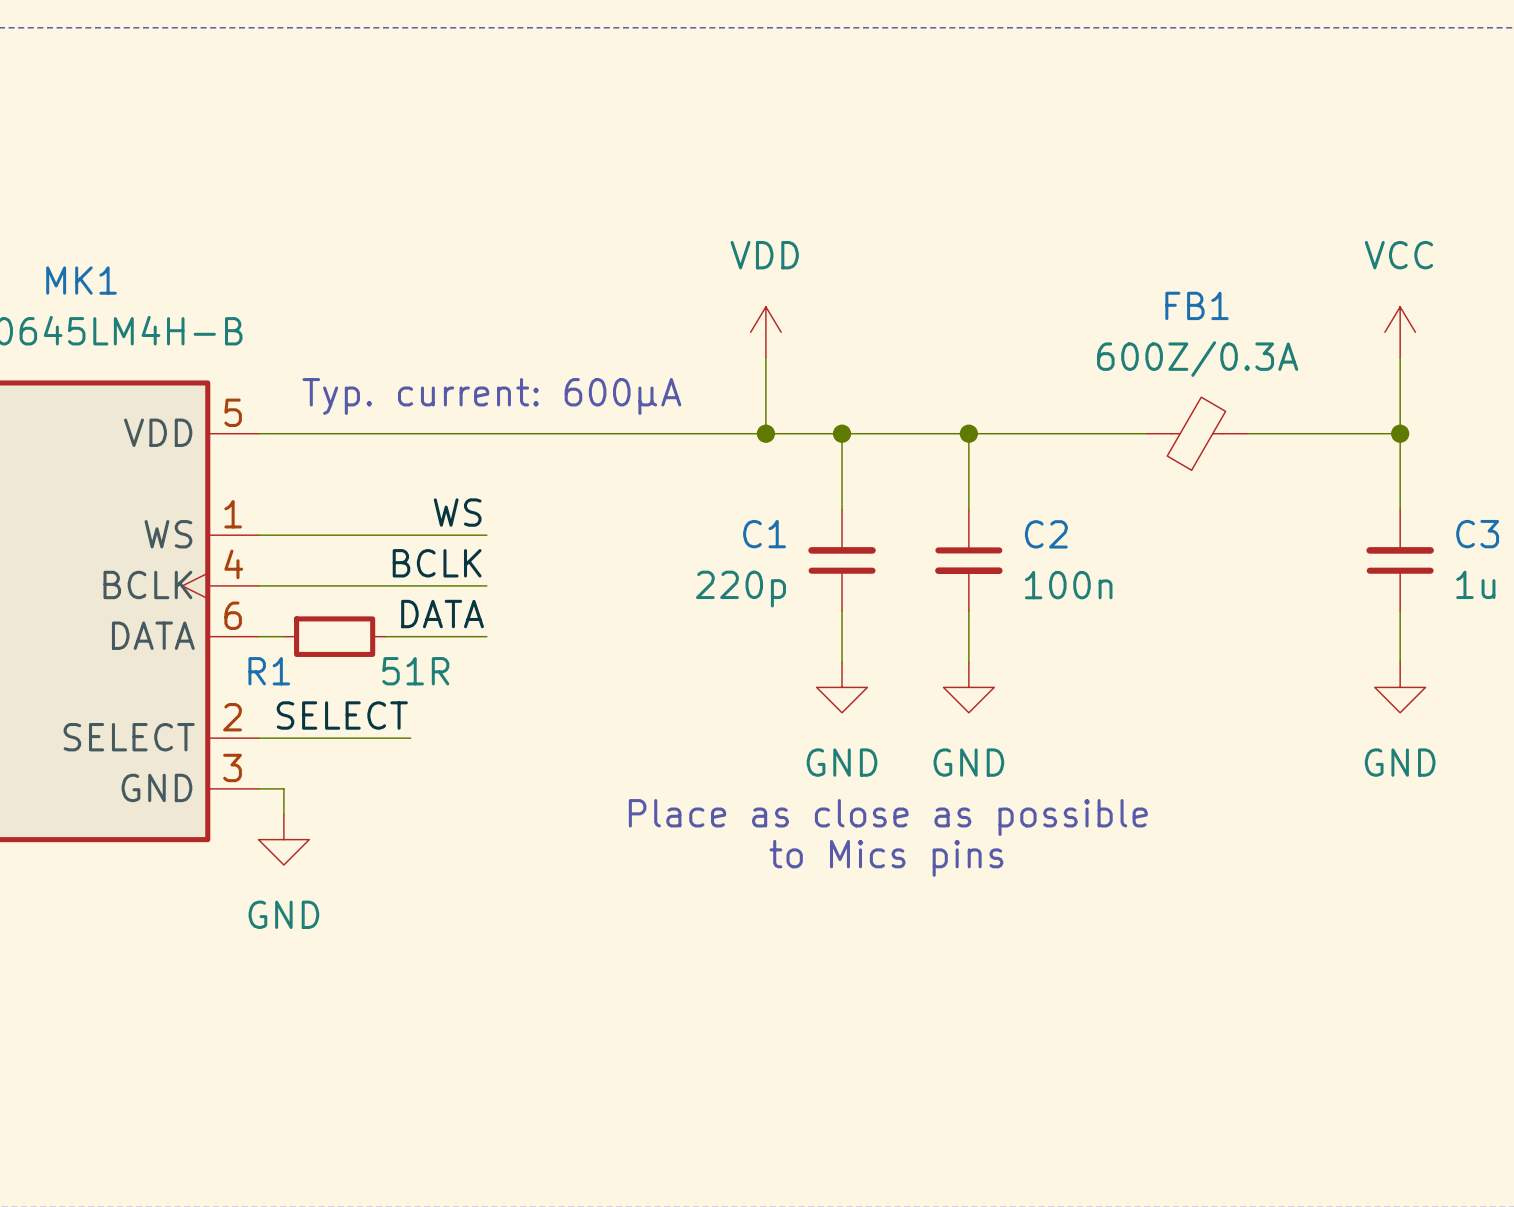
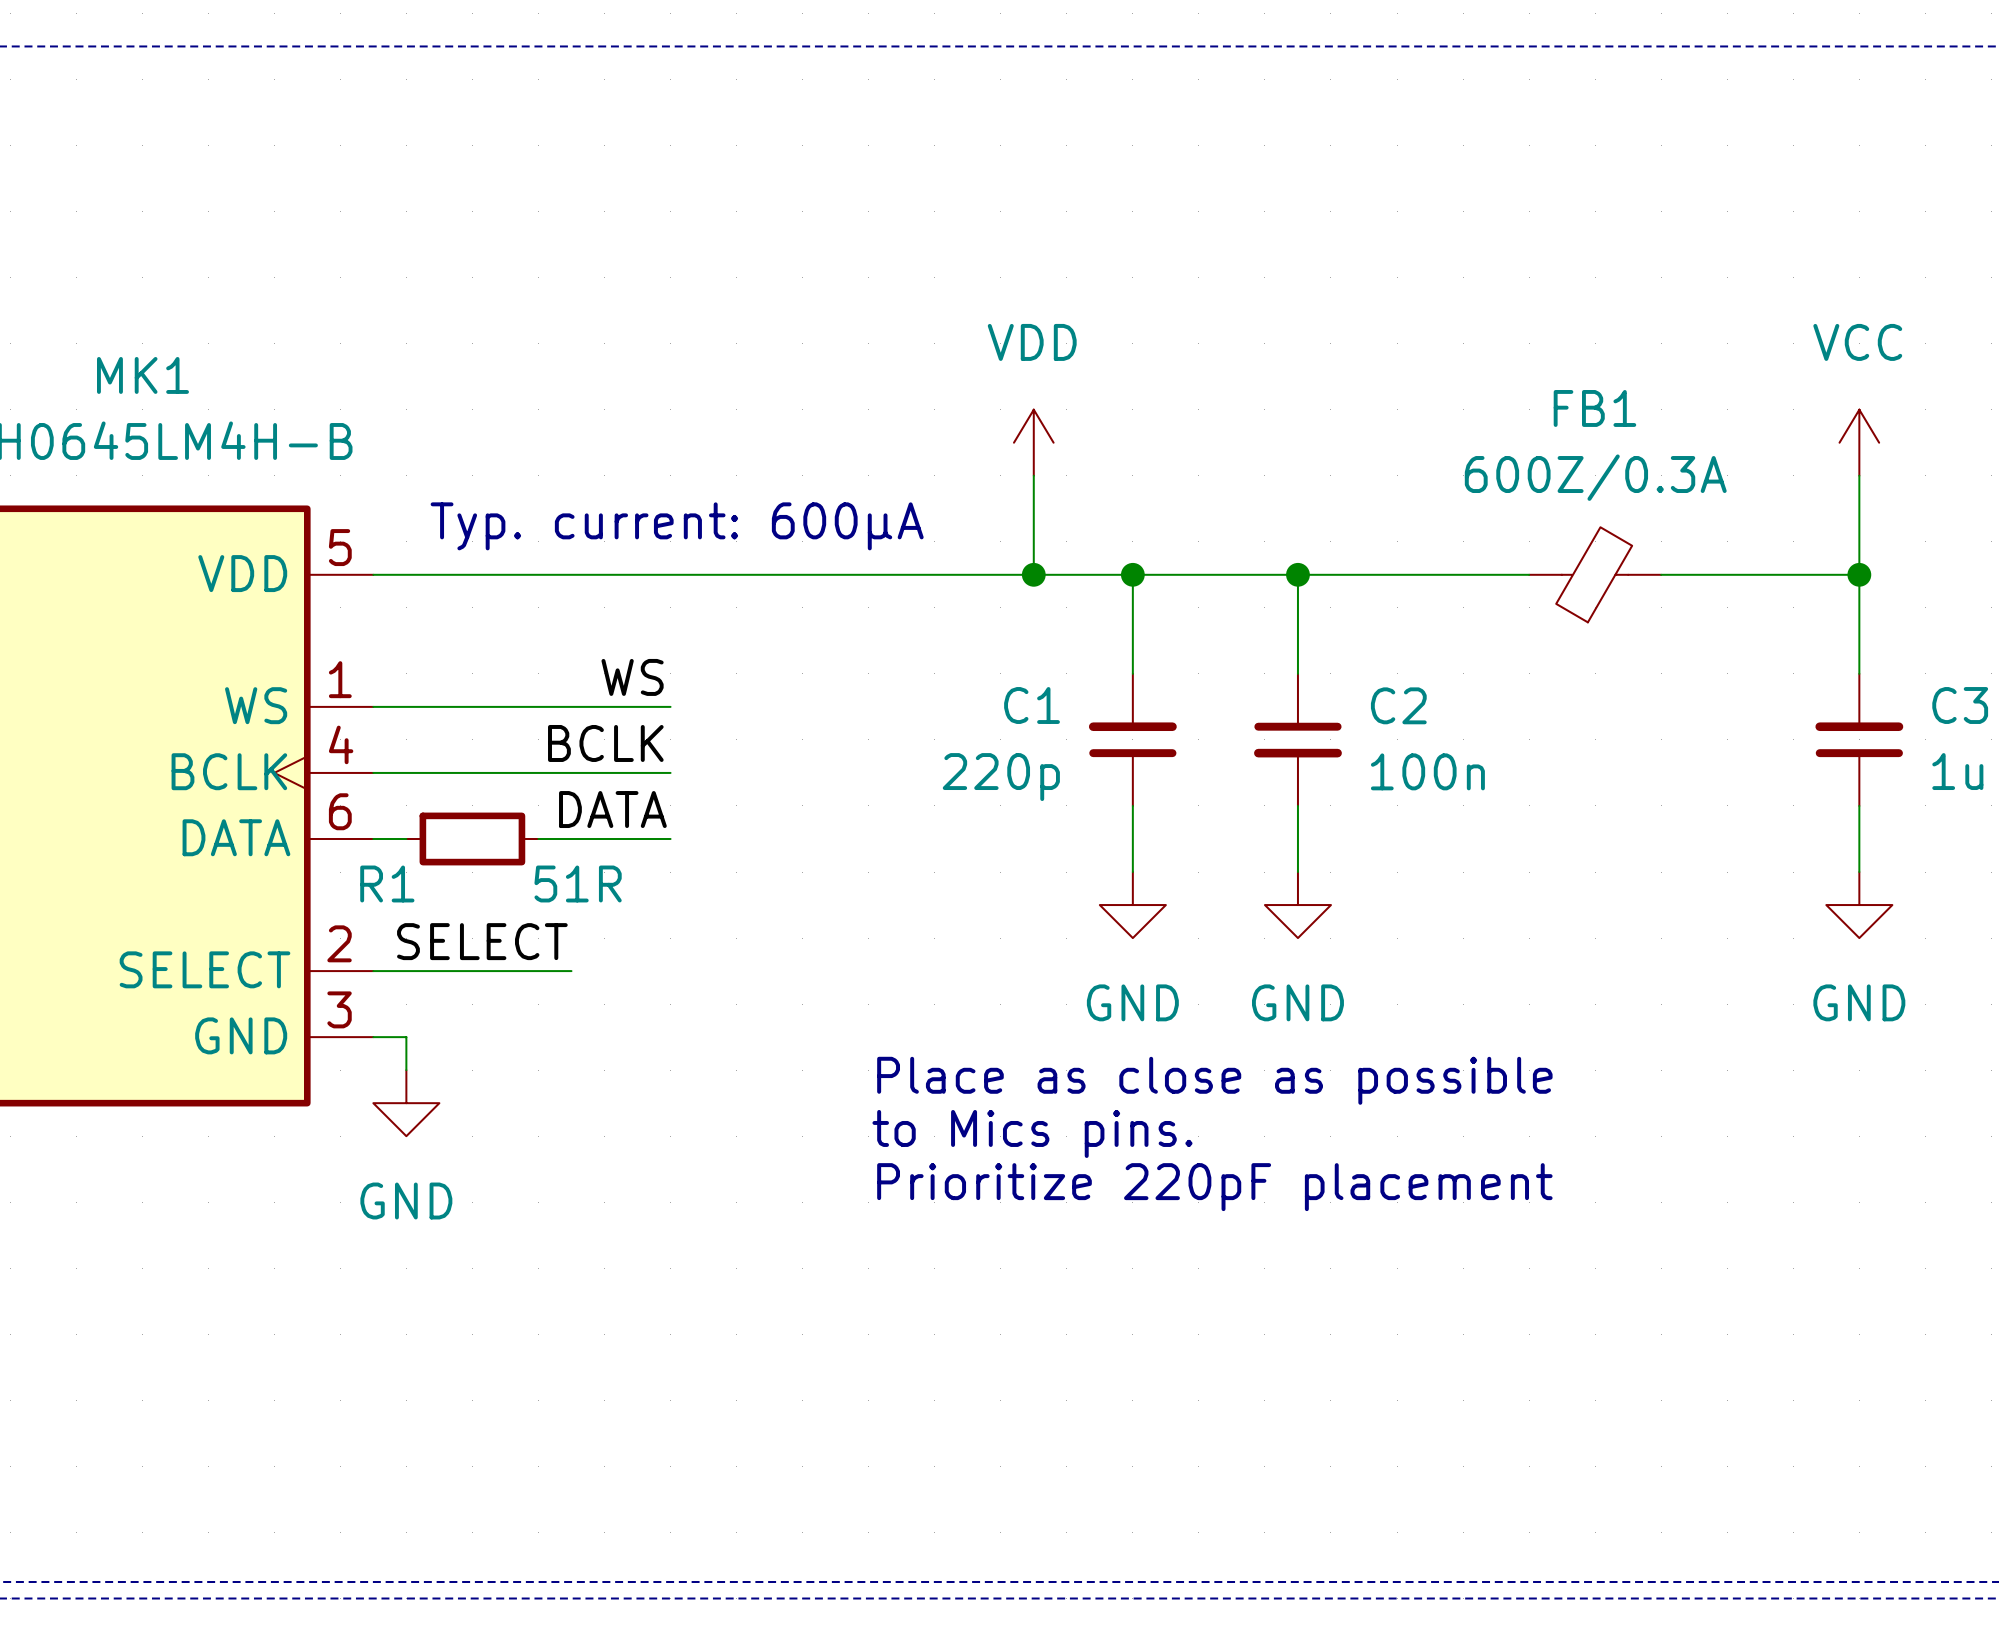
text position: Place as close as possible (888, 817) -> Place as close as possible (1214, 1080)
text: to Mics pins (886, 858) -> to Mics pins. (1032, 1133)
text: none -> Prioritize 220pF placement (1214, 1187)

